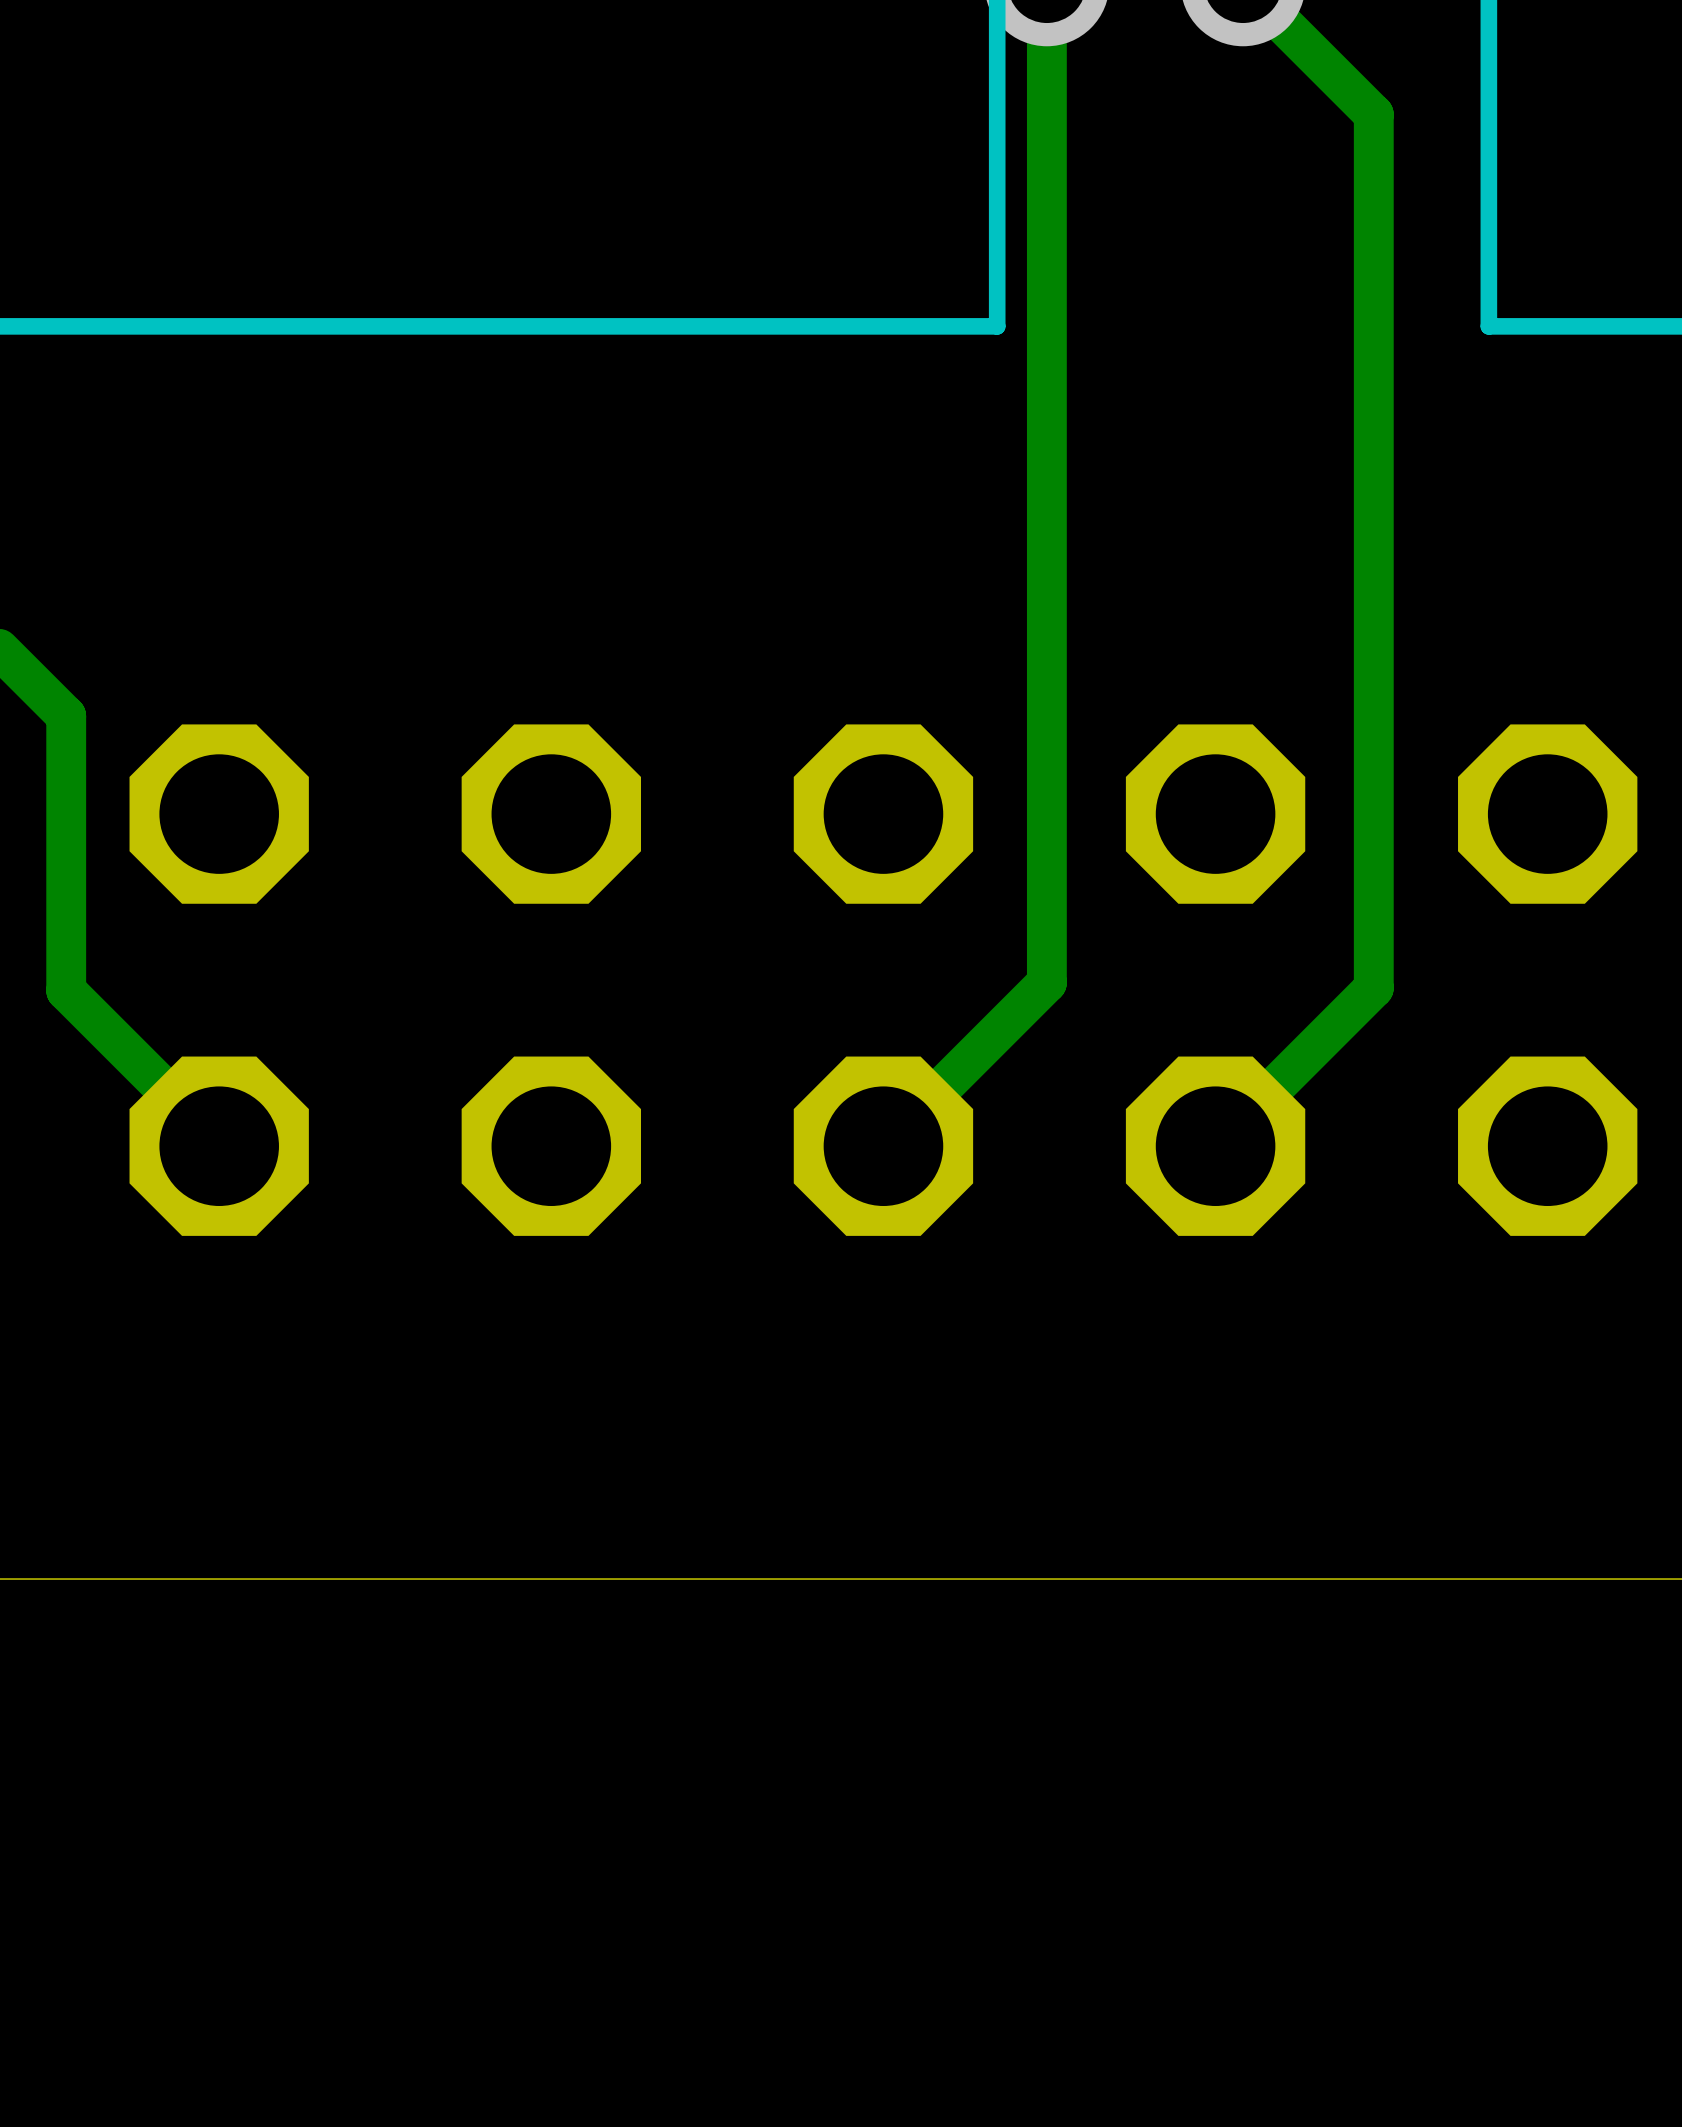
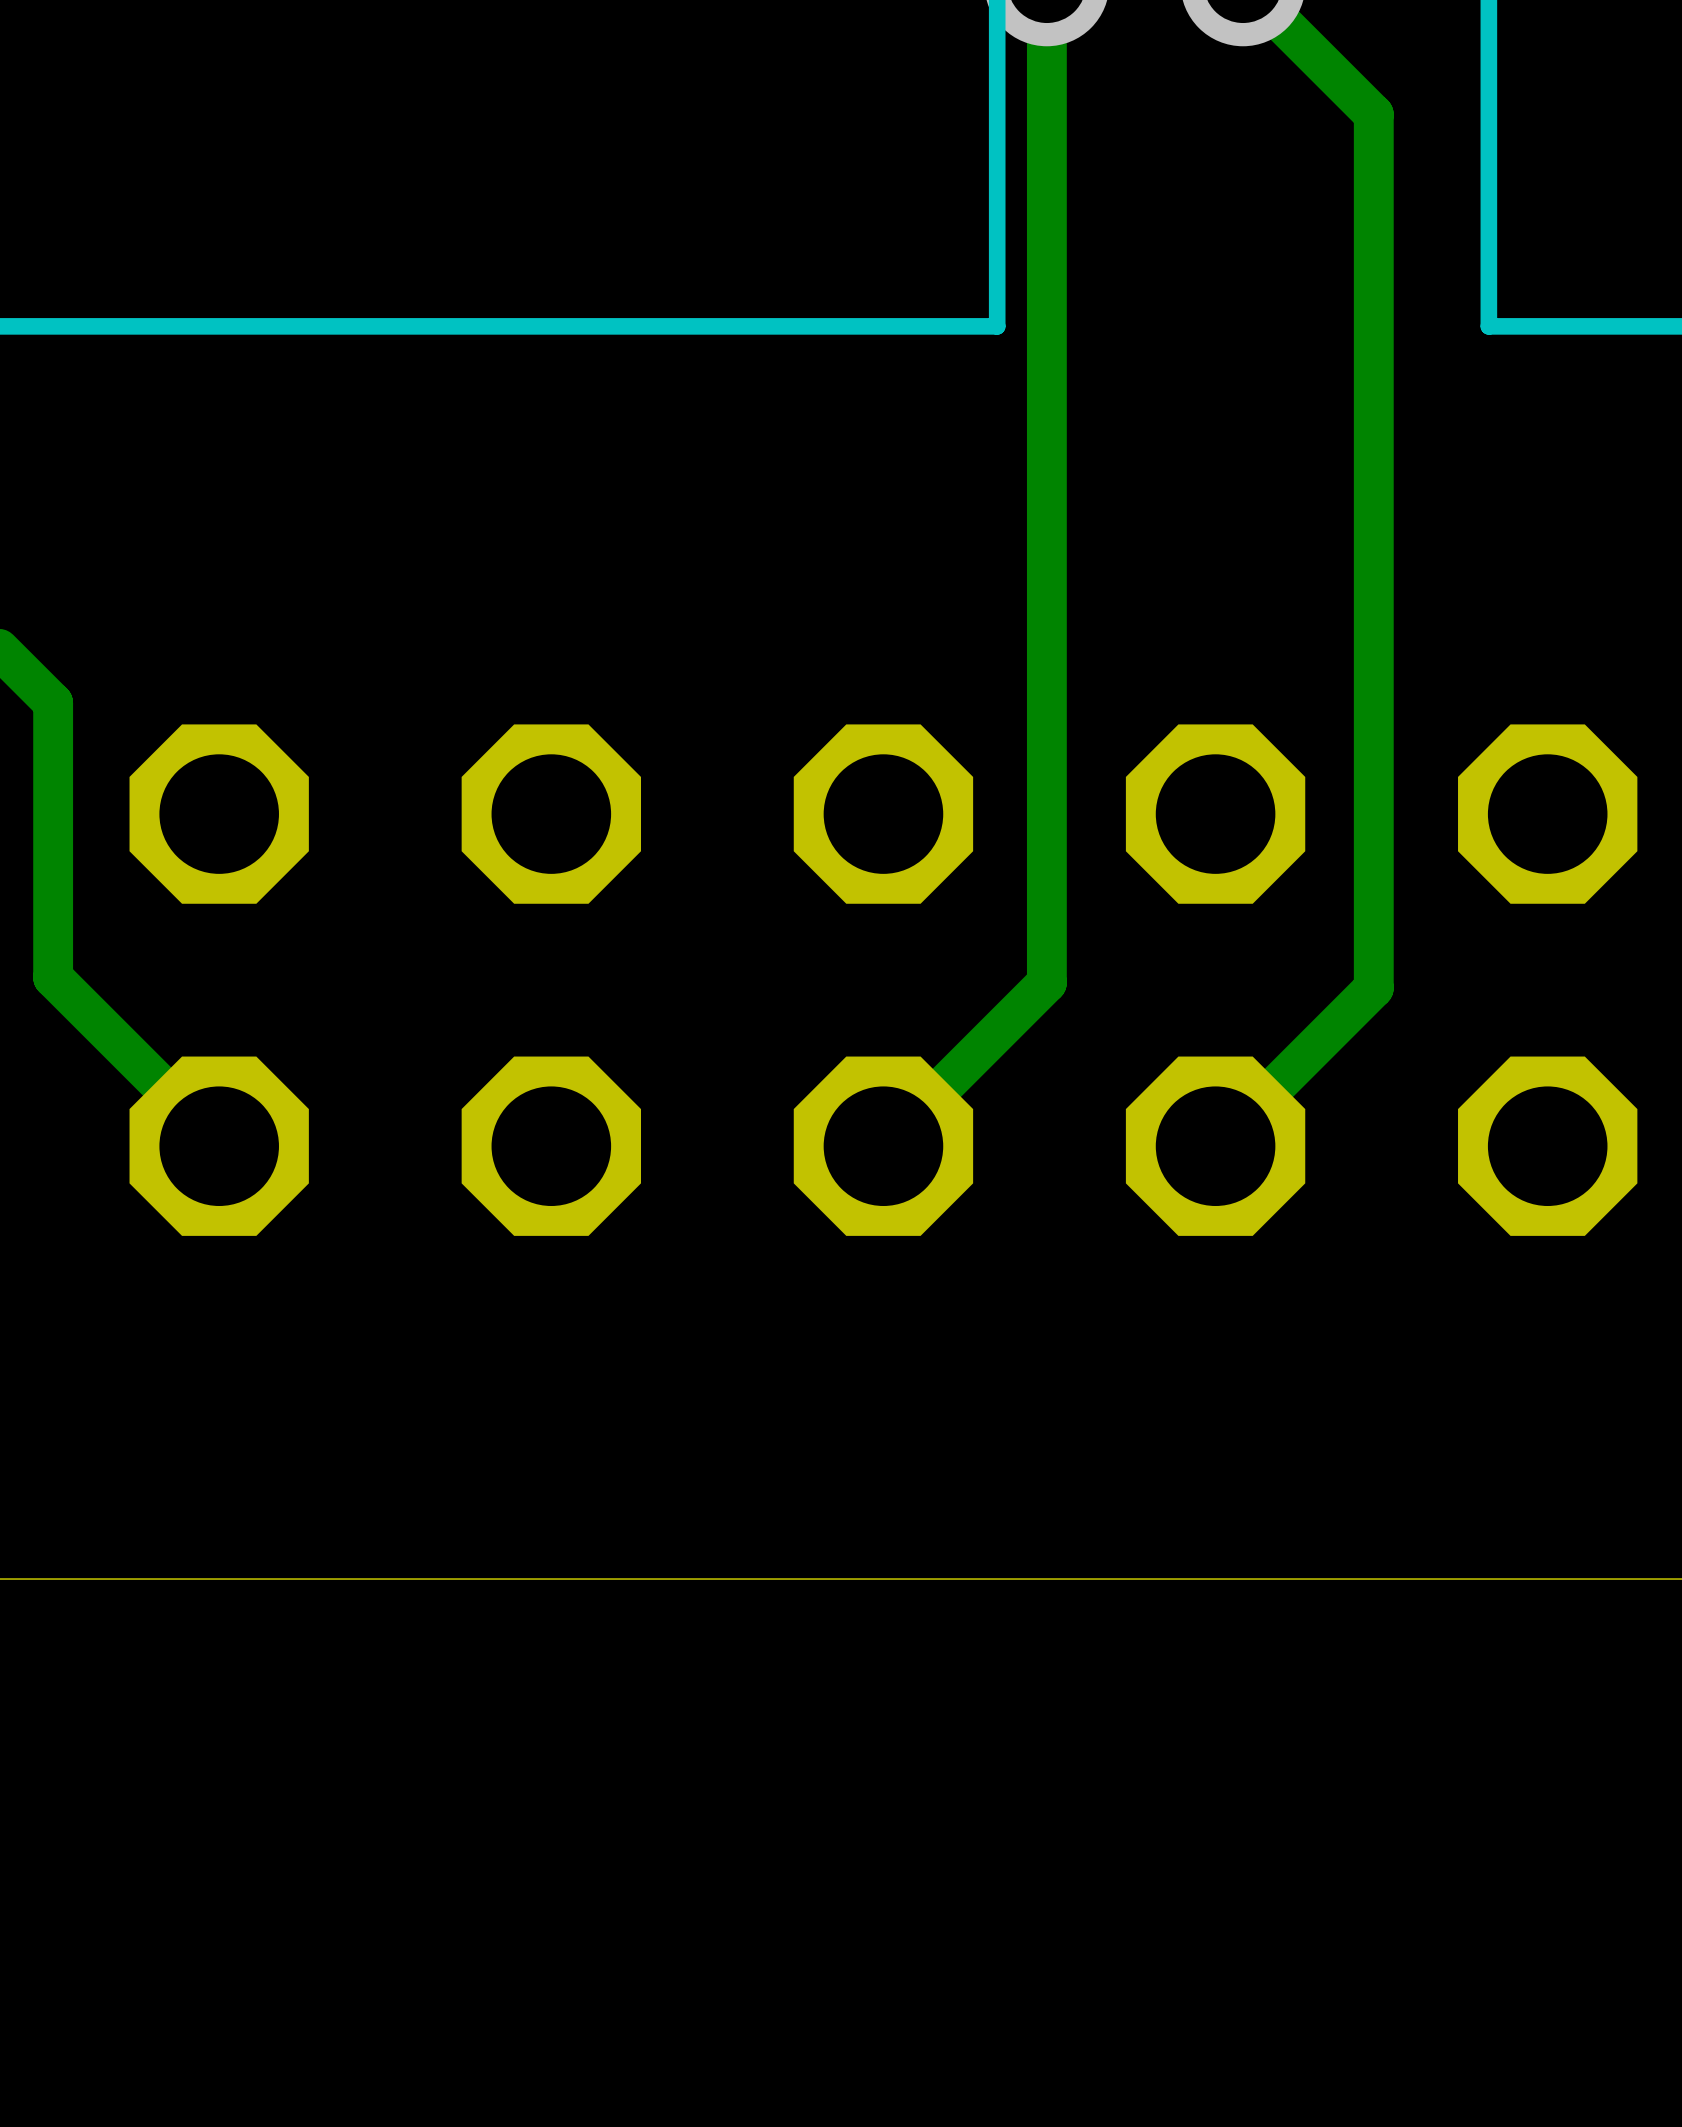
track: (53, 702) (66, 716) (66, 990) -> (53, 702) (53, 977) (66, 990)

